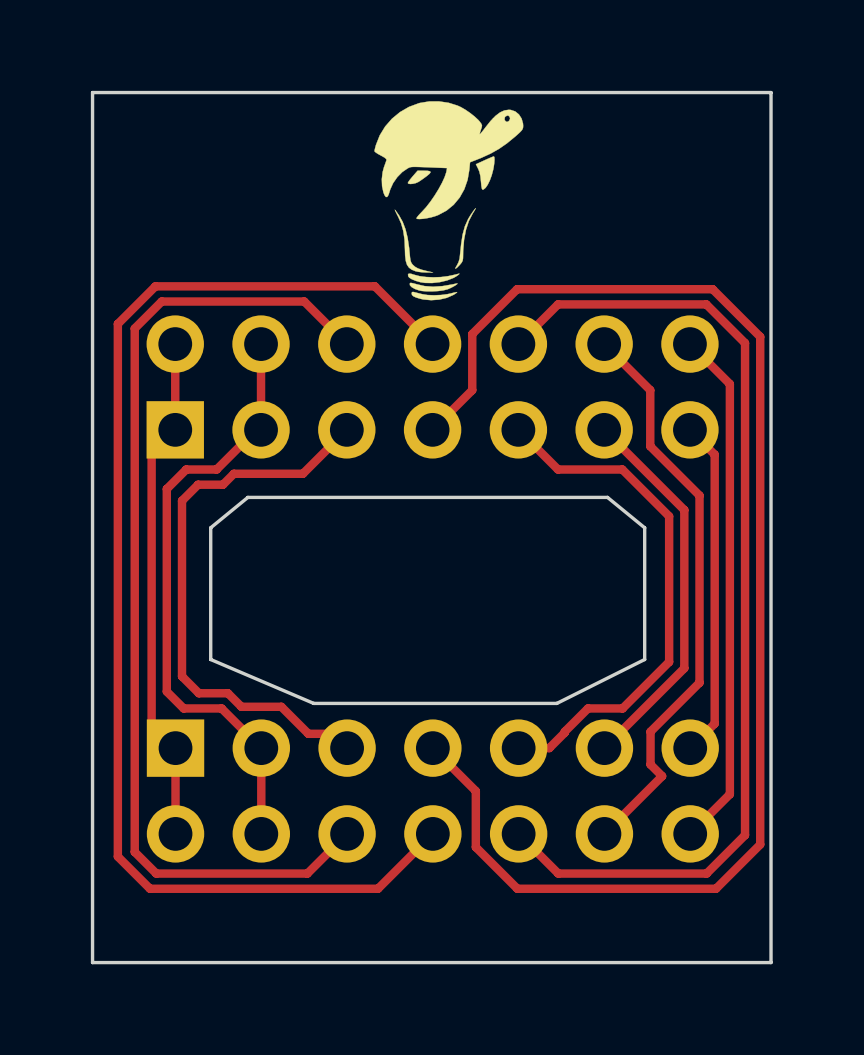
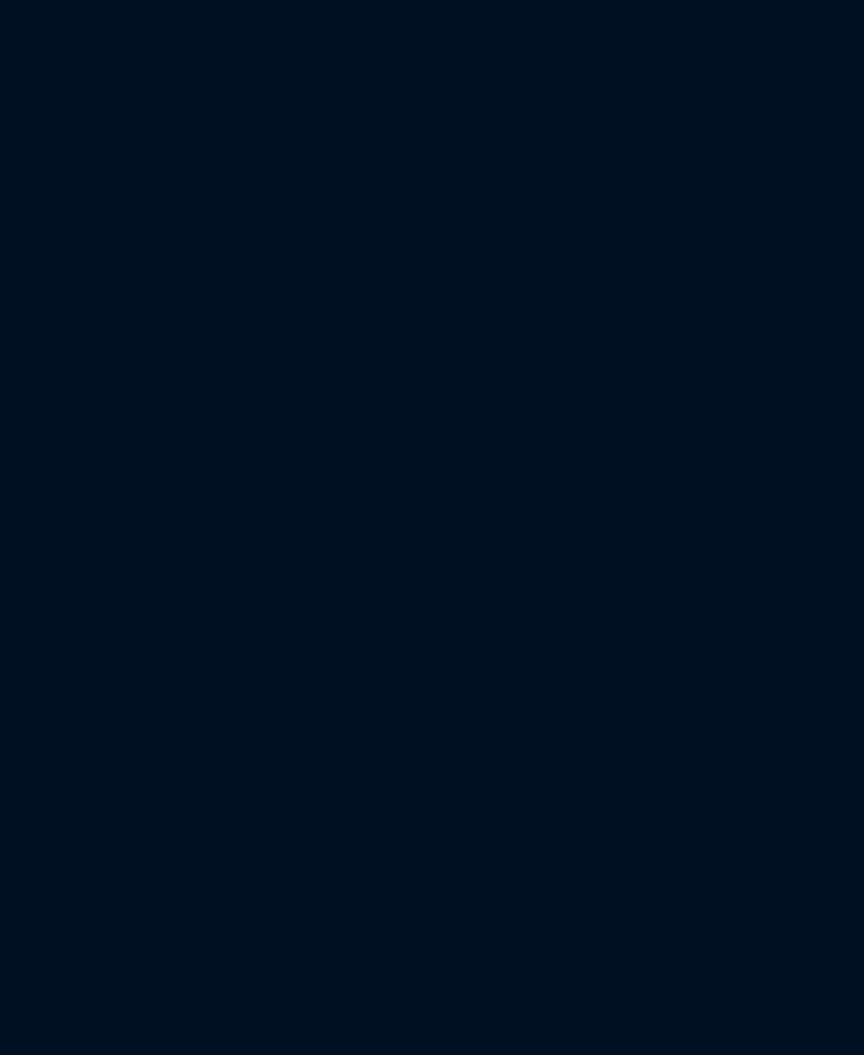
board edge: (771, 92) (92, 92) (92, 962) (771, 962) (771, 92) -> none
drawing: [374, 101, 524, 301] -> none
top track: (175, 344) (175, 429) (151, 453) (151, 724) (175, 748) (175, 833) -> none
top track: (261, 344) (261, 429) (256, 429) (216, 469) (186, 469) (166, 488) (166, 691) (183, 708) (221, 708) (261, 748) (261, 833) -> none
top track: (346, 344) (304, 301) (161, 301) (134, 328) (134, 852) (156, 873) (307, 873) (347, 833) -> none
top track: (432, 344) (374, 286) (155, 286) (117, 323) (117, 856) (150, 888) (378, 888) (432, 833) -> none
top track: (518, 344) (558, 304) (706, 304) (745, 343) (745, 835) (706, 873) (558, 873) (518, 833) -> none
top track: (604, 344) (650, 390) (650, 446) (699, 495) (699, 682) (650, 731) (650, 764) (662, 776) (604, 833) -> none
top track: (689, 344) (729, 384) (729, 794) (690, 833) -> none
part: (432, 386) -> none
top track: (346, 429) (302, 473) (233, 473) (222, 484) (198, 484) (182, 500) (182, 676) (198, 693) (227, 693) (241, 706) (281, 706) (308, 733) (332, 733) (347, 748) -> none
top track: (432, 429) (472, 390) (472, 334) (517, 289) (712, 289) (760, 336) (760, 844) (716, 888) (517, 888) (475, 847) (475, 791) (432, 748) -> none
top track: (518, 429) (558, 469) (622, 469) (669, 516) (669, 661) (622, 708) (587, 708) (549, 748) (518, 748) -> none
top track: (604, 429) (684, 510) (684, 668) (604, 748) -> none
top track: (689, 429) (714, 454) (714, 723) (690, 748) -> none
board edge: (607, 497) (644, 527) (644, 659) (556, 703) (313, 703) (210, 659) (210, 527) (247, 497) (607, 497) -> none
part: (432, 791) -> none

